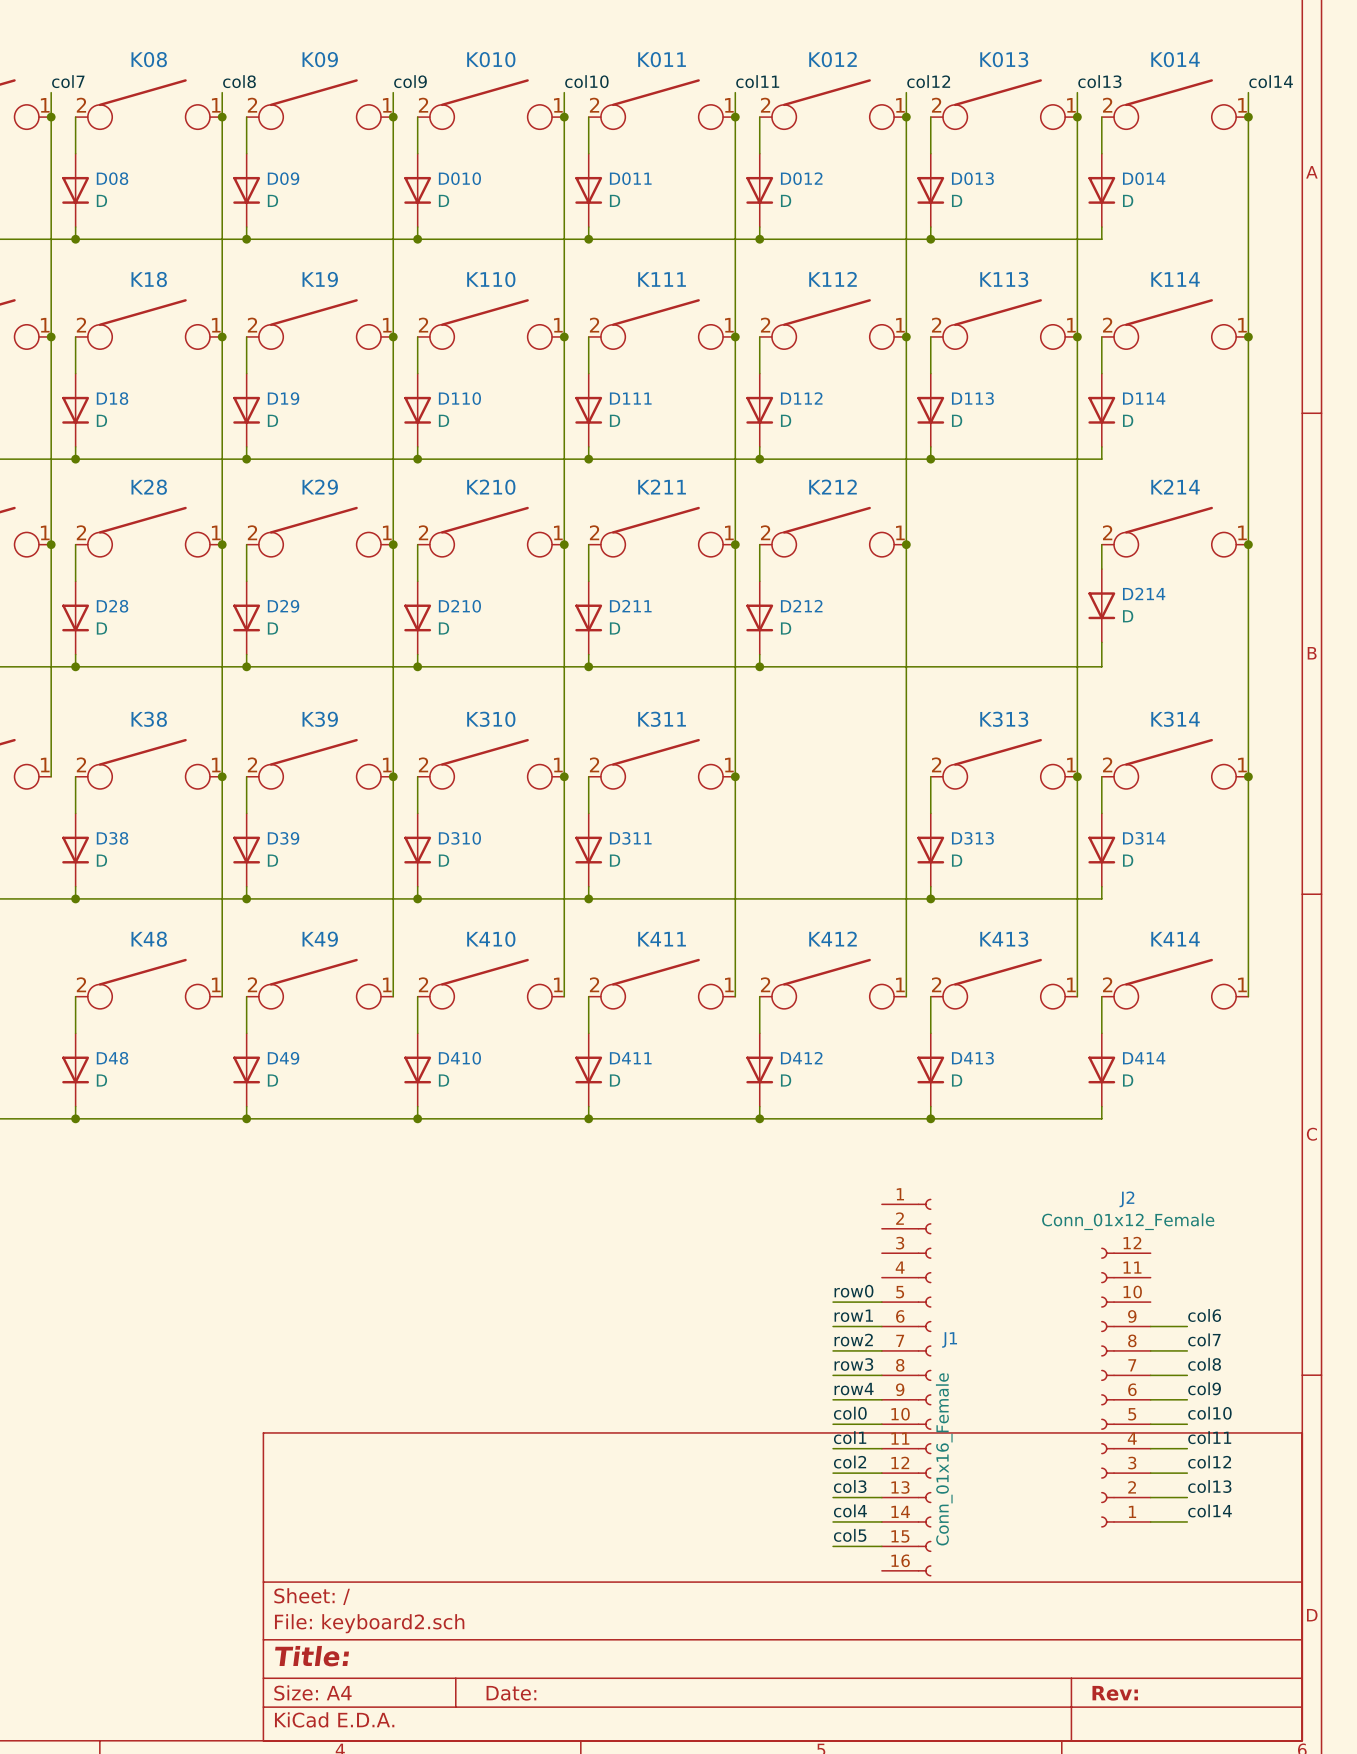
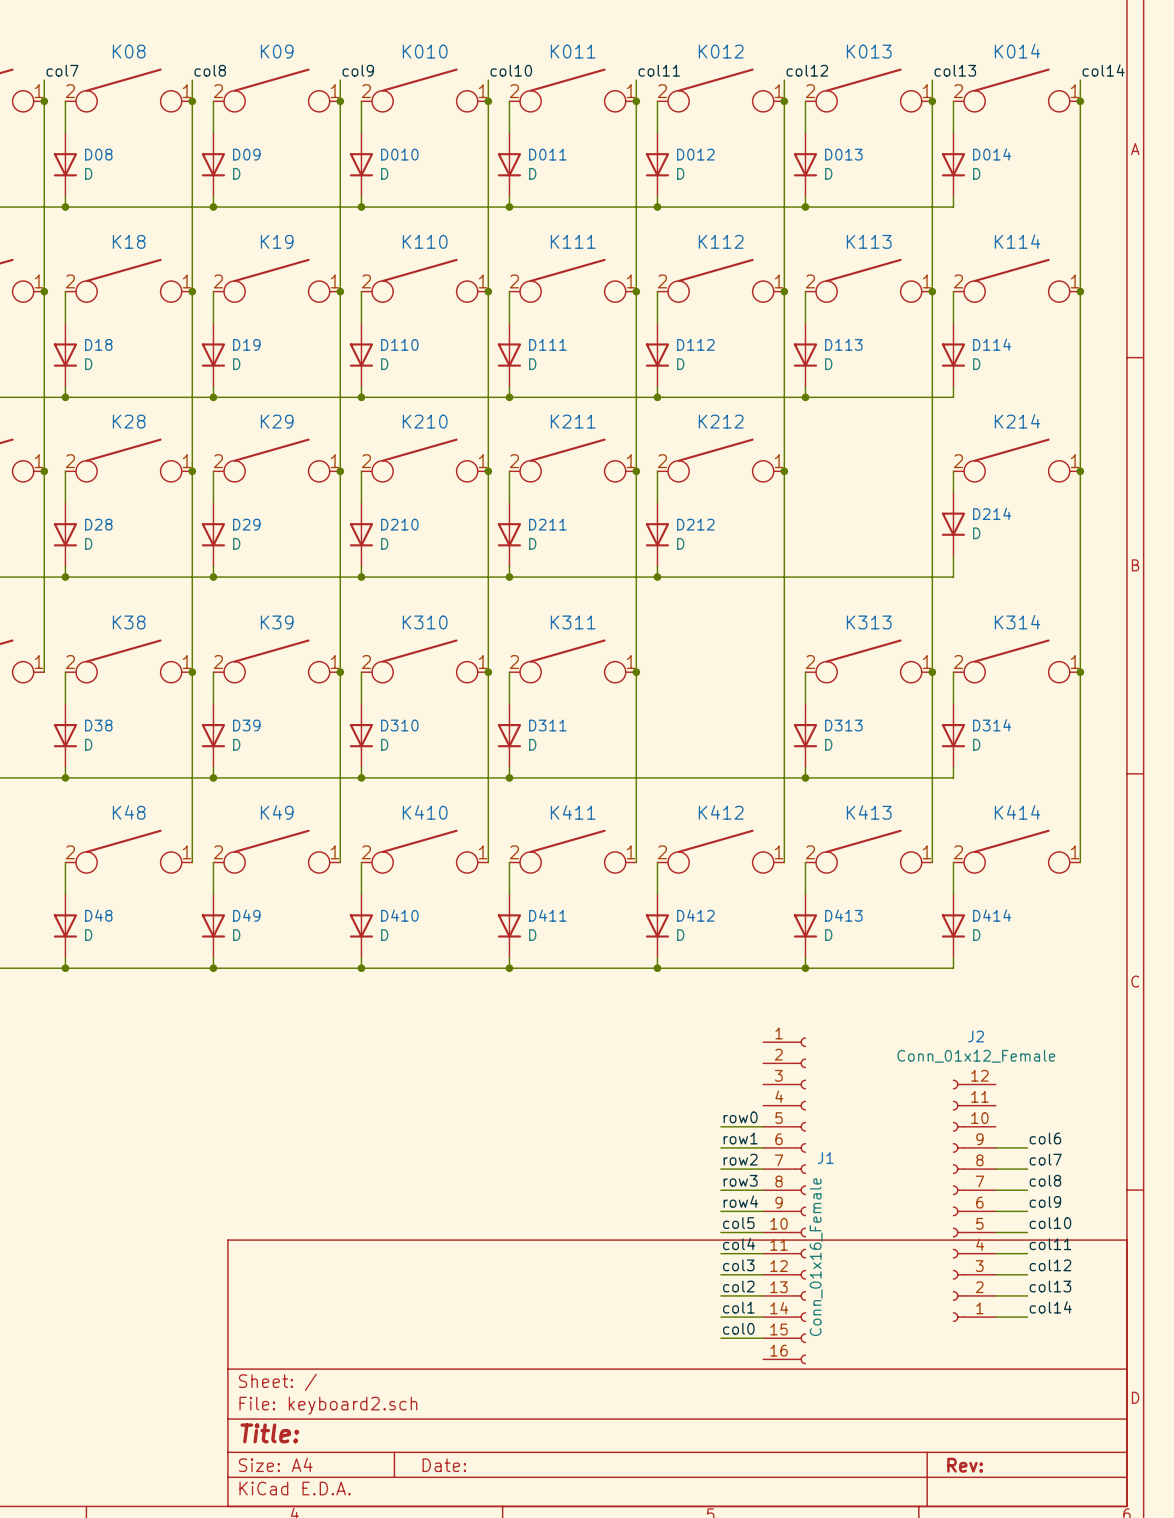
label: col0 (850, 1413) -> col5 (738, 1223)
label: col1 (850, 1437) -> col4 (739, 1243)
label: col2 (850, 1462) -> col3 (738, 1265)
label: col3 (850, 1486) -> col2 (738, 1286)
label: col4 (850, 1510) -> col1 (738, 1307)
label: col5 (850, 1535) -> col0 (738, 1328)

